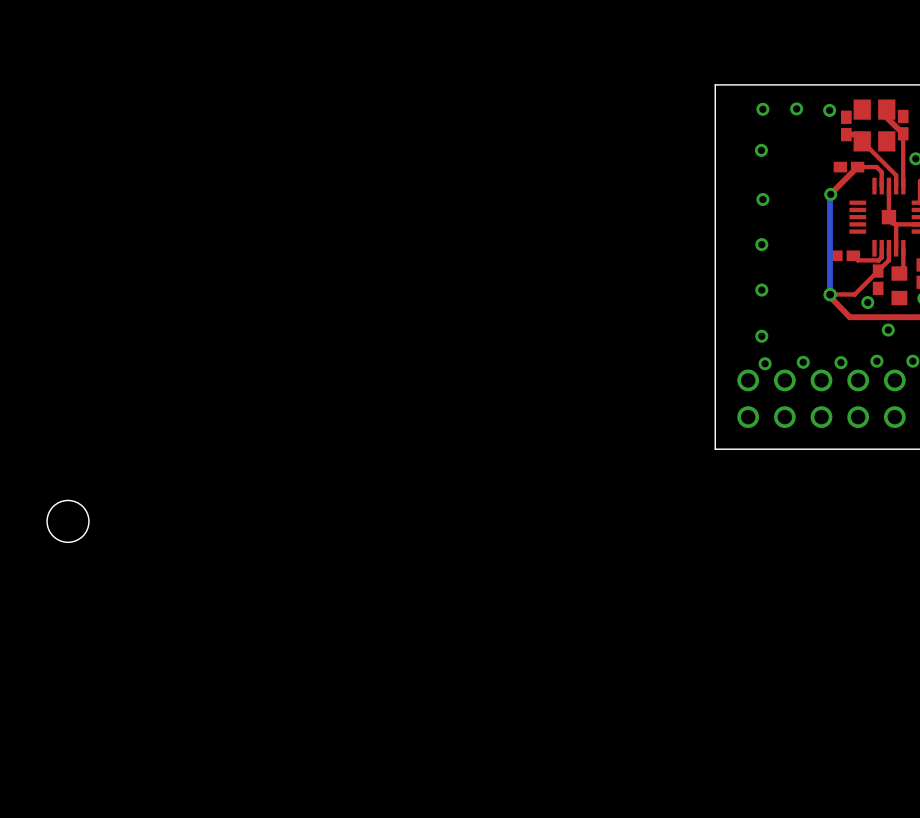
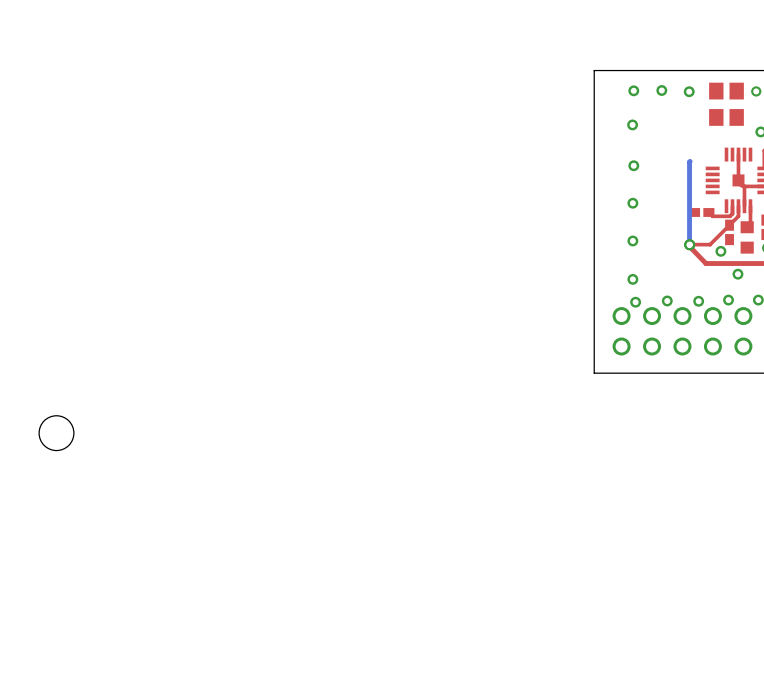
top track: (886, 109) (886, 117) (903, 133) (903, 185) -> none
via: none -> (756, 91)
part: (846, 125) -> none
part: (903, 125) -> none
top track: (846, 134) (862, 134) (862, 141) (896, 175) (896, 186) -> none
part: (848, 167) -> none
top track: (881, 186) (881, 172) (876, 167) (857, 167) (829, 194) -> none
via: (830, 194) -> none

